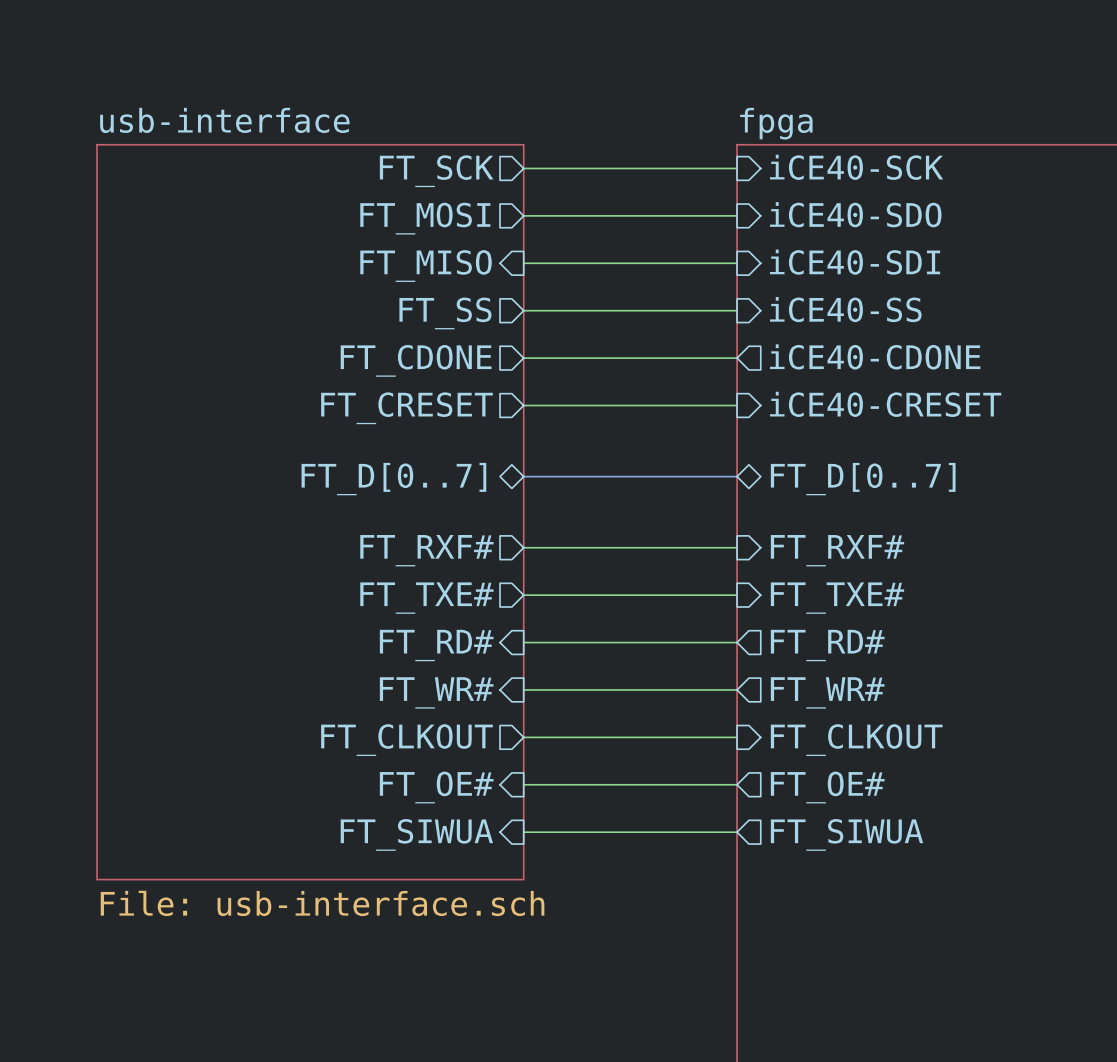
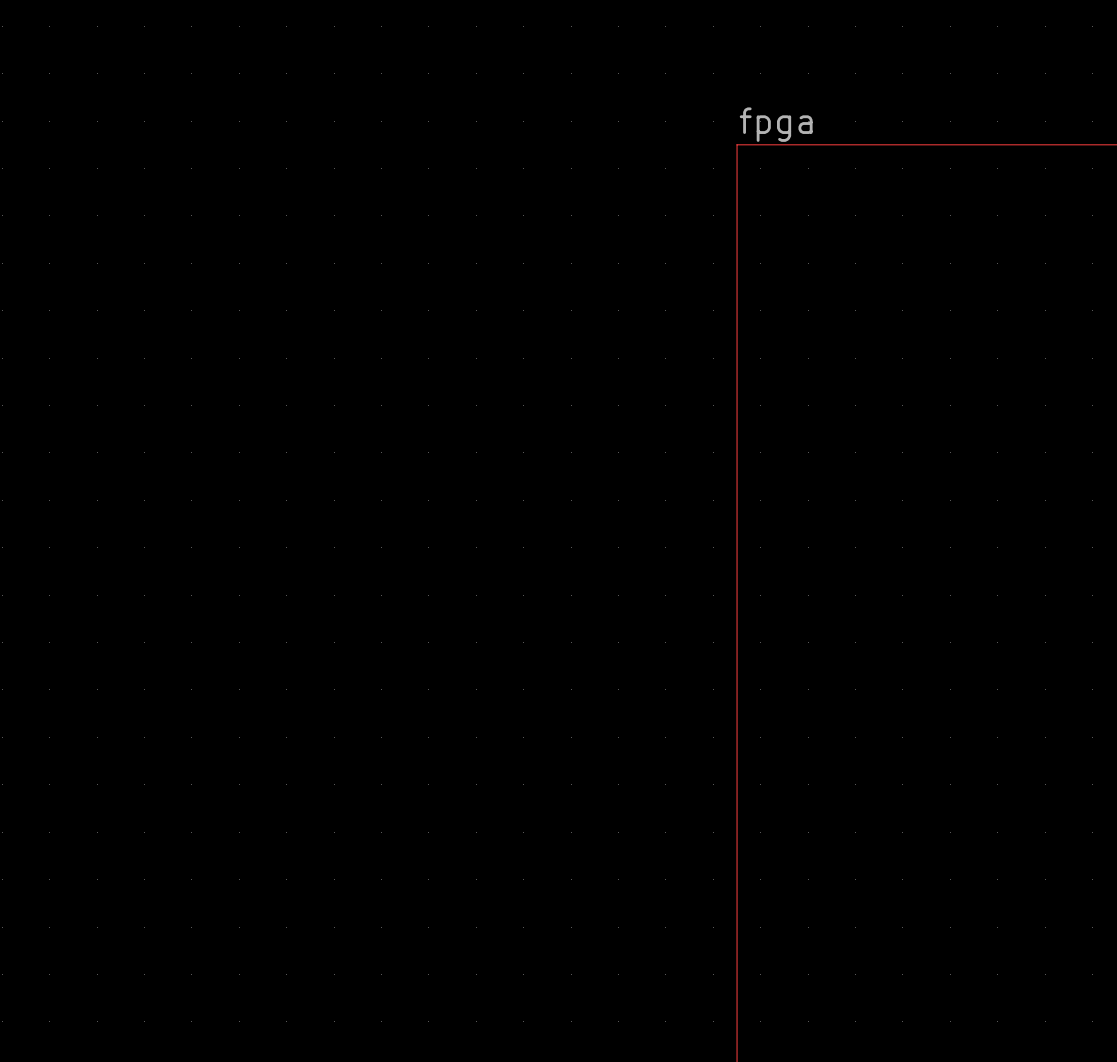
sheet pin: iCE40-SCK (856, 167) -> none
wire: (523, 168) (737, 168) -> none
sheet pin: FT_SCK (436, 171) -> none
sheet pin: iCE40-SDO (855, 214) -> none
wire: (523, 215) (737, 215) -> none
sheet pin: FT_MOSI (425, 218) -> none
sheet pin: iCE40-SDI (855, 262) -> none
wire: (523, 263) (737, 263) -> none
sheet pin: FT_MISO (426, 266) -> none
sheet pin: iCE40-SS (845, 309) -> none
wire: (523, 310) (737, 310) -> none
sheet pin: FT_SS (445, 313) -> none
sheet pin: iCE40-CDONE (875, 356) -> none
wire: (523, 358) (737, 358) -> none
sheet pin: FT_CDONE (416, 360) -> none
sheet pin: iCE40-CRESET (885, 404) -> none
wire: (523, 405) (737, 405) -> none
sheet pin: FT_CRESET (407, 408) -> none
bus: (523, 476) (737, 476) -> none
sheet pin: FT_D[0..7] (393, 479) -> none
sheet pin: FT_D[0..7] (863, 479) -> none
sheet usb-interface: File: usb-interface.sch (310, 512) -> none
wire: (523, 547) (737, 547) -> none
sheet pin: FT_RXF# (426, 550) -> none
sheet pin: FT_RXF# (837, 550) -> none
wire: (523, 595) (737, 595) -> none
sheet pin: FT_TXE# (426, 598) -> none
sheet pin: FT_TXE# (837, 598) -> none
wire: (523, 642) (737, 642) -> none
sheet pin: FT_RD# (436, 645) -> none
sheet pin: FT_RD# (827, 645) -> none
wire: (523, 689) (737, 689) -> none
sheet pin: FT_WR# (436, 692) -> none
sheet pin: FT_WR# (827, 692) -> none
wire: (523, 737) (737, 737) -> none
sheet pin: FT_CLKOUT (407, 740) -> none
sheet pin: FT_CLKOUT (856, 740) -> none
wire: (523, 784) (737, 784) -> none
sheet pin: FT_OE# (436, 787) -> none
sheet pin: FT_OE# (827, 787) -> none
wire: (523, 832) (737, 832) -> none
sheet pin: FT_SIWUA (416, 834) -> none
sheet pin: FT_SIWUA (847, 834) -> none

